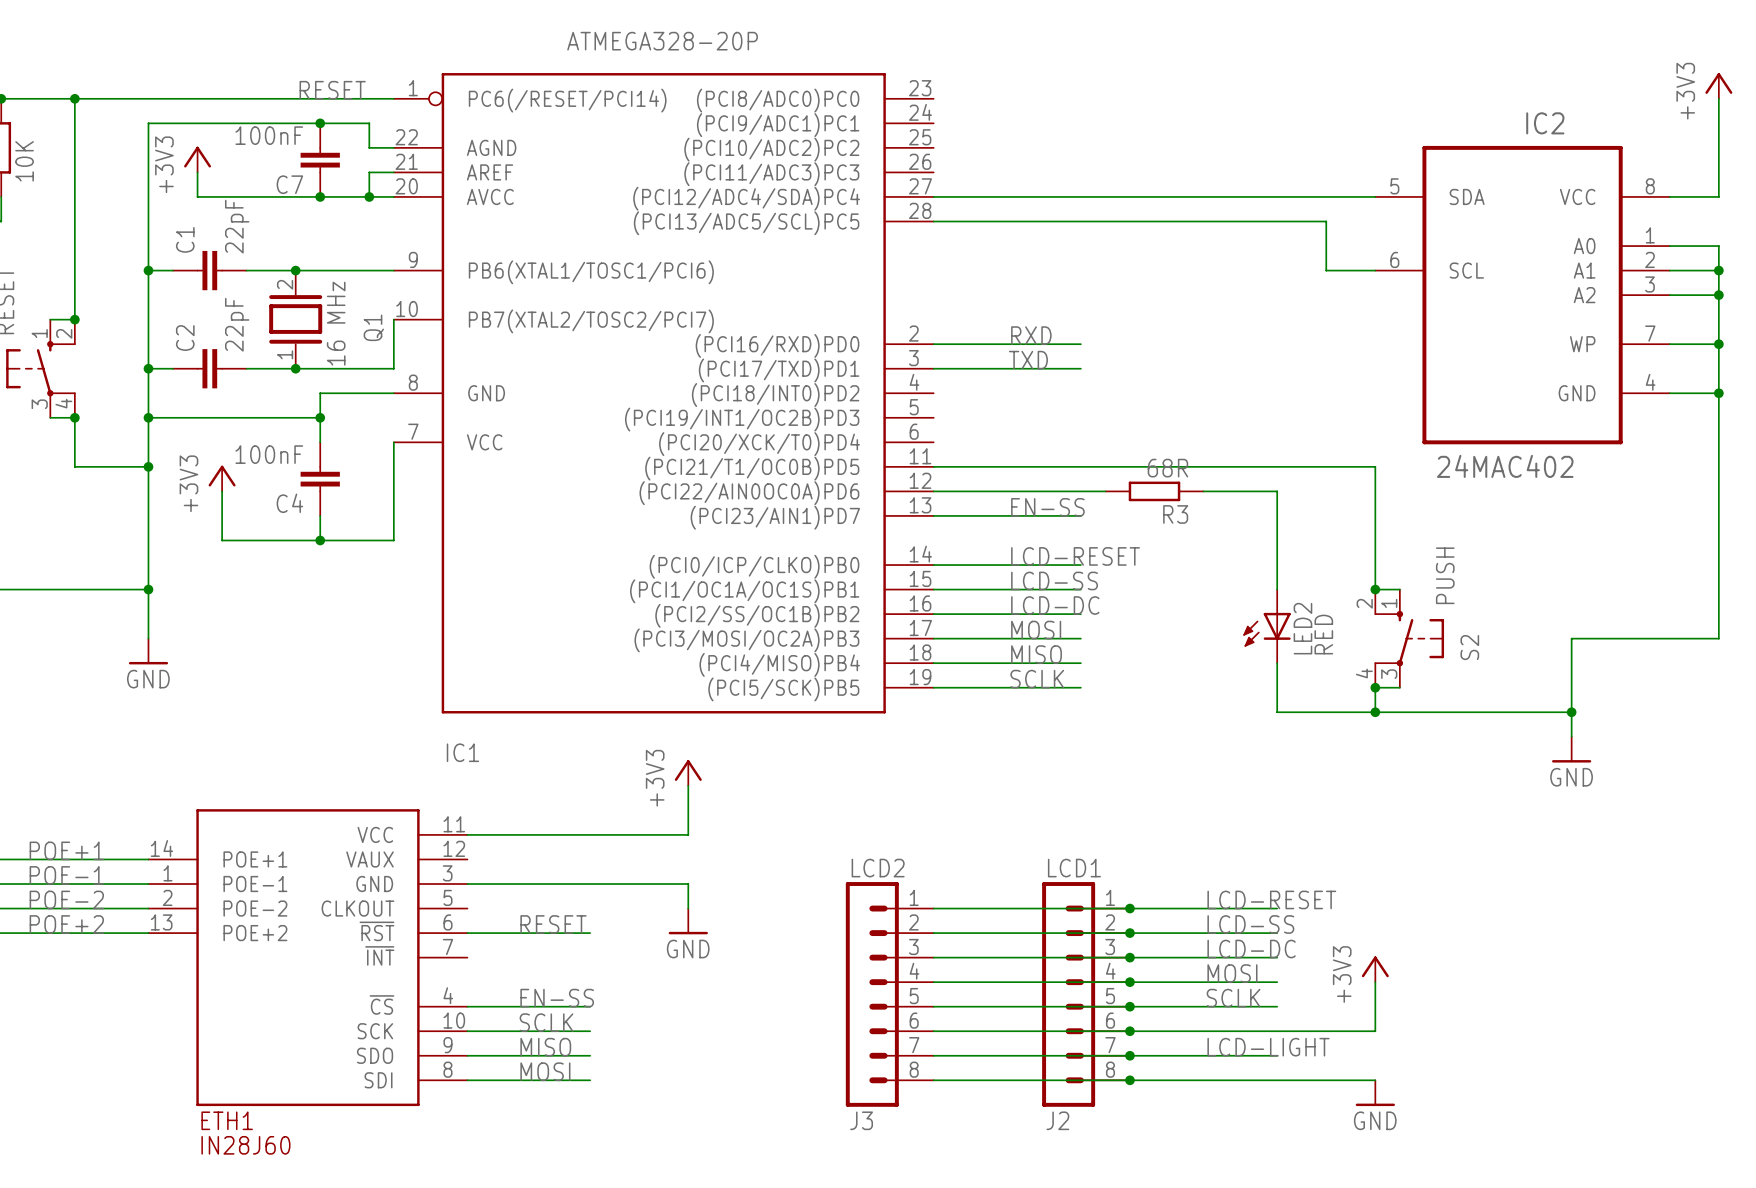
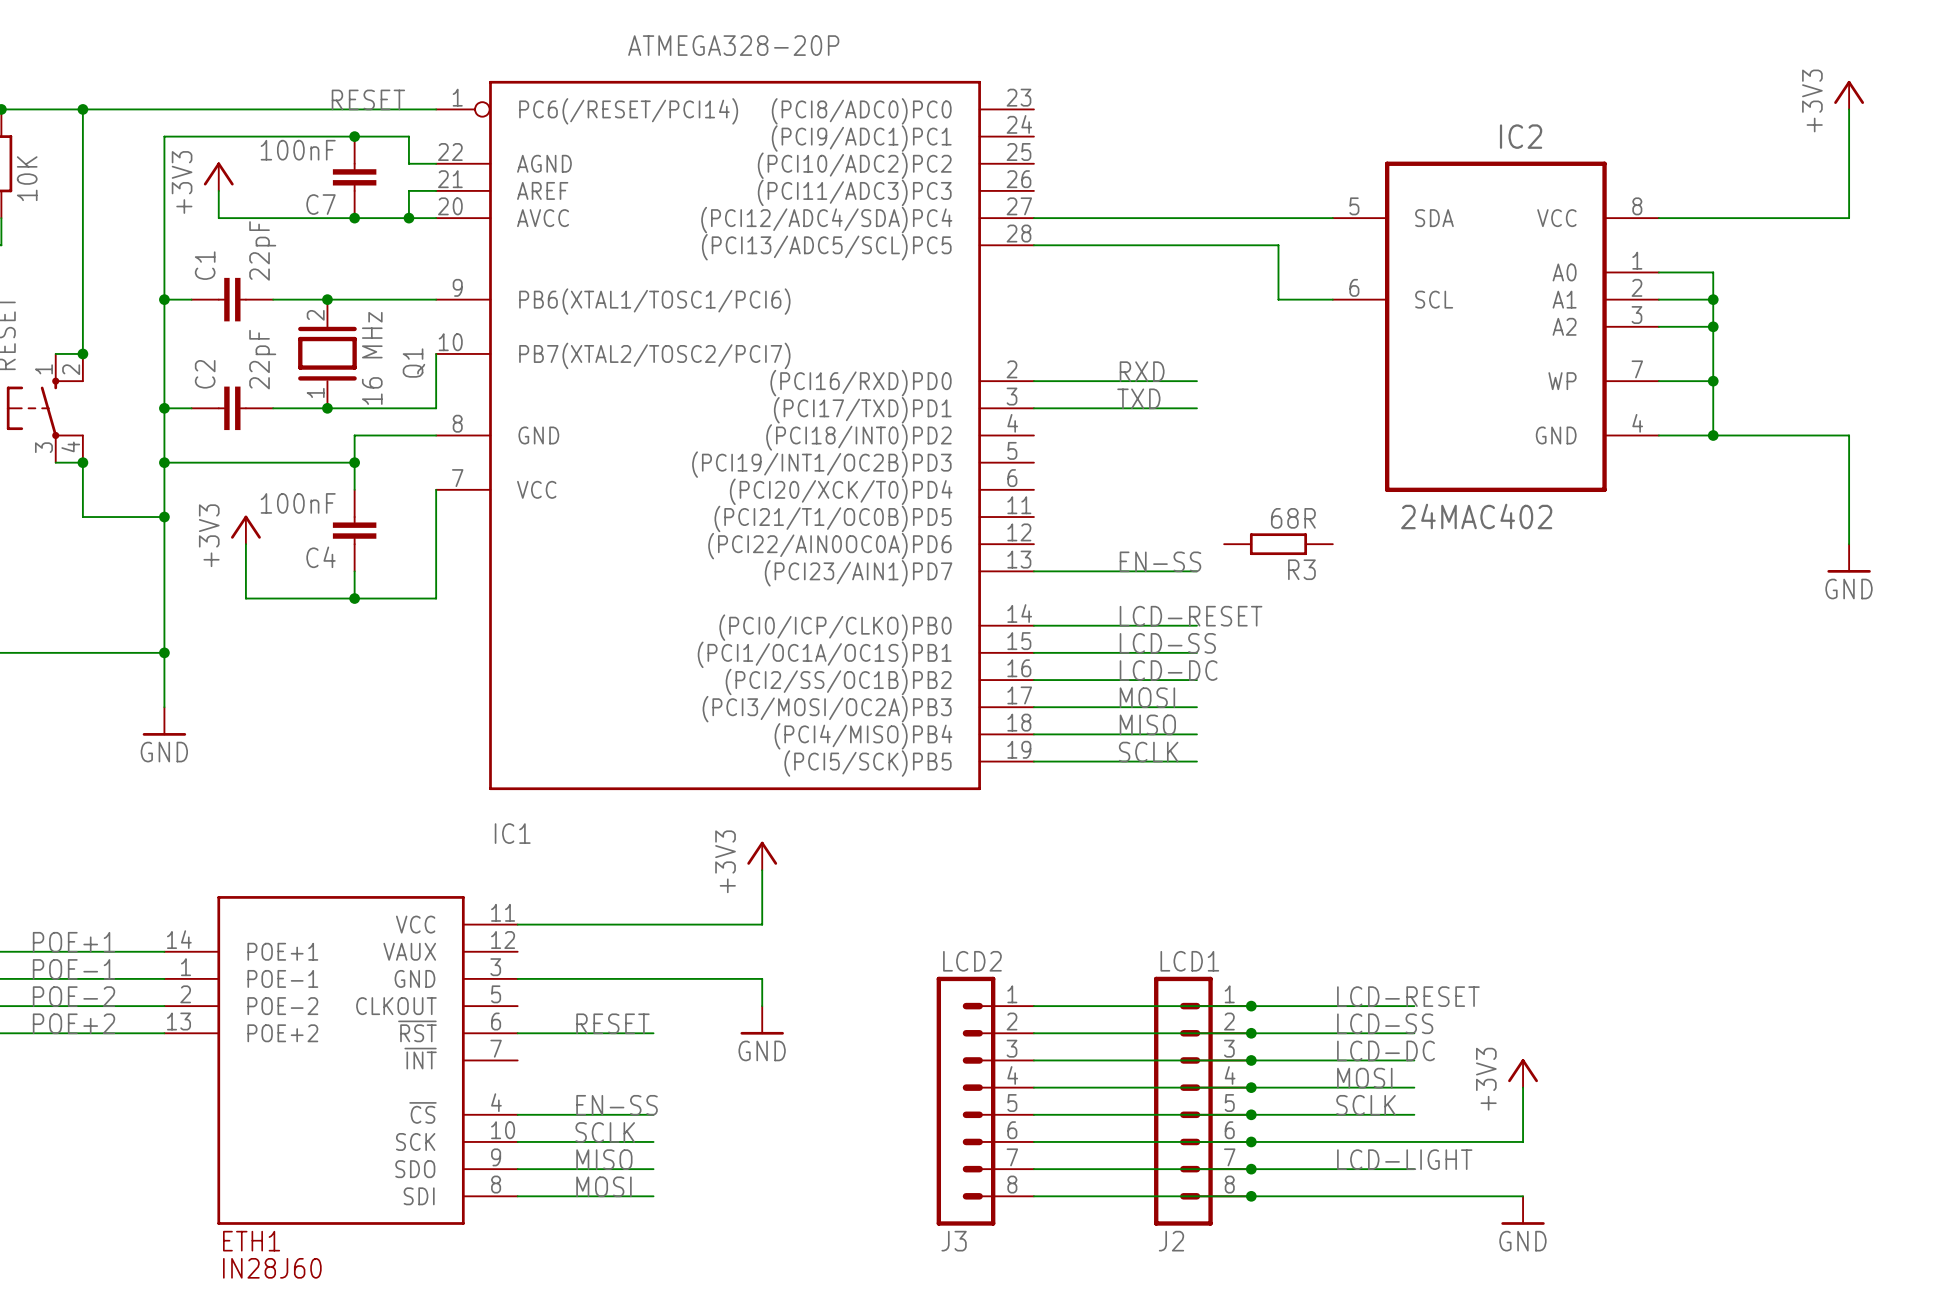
power symbol position: +3V3 (1718, 85) -> +3V3 (1849, 95)
wire: none -> (1849, 109) (1849, 218) (1658, 218)
wire: (1718, 98) (1718, 196) (1669, 196) -> none
wire: (1203, 196) (1375, 196) -> none
wire: (1154, 221) (1326, 221) (1326, 270) (1375, 270) -> (1278, 245) (1278, 299) (1332, 299)
wire: none -> (1658, 272) (1713, 272) (1713, 435)
wire: (1669, 246) (1718, 246) (1718, 638) (1571, 638) (1571, 736) -> none
junction: none -> (1713, 299)
wire: (1669, 270) (1718, 270) -> (1658, 299) (1713, 299)
junction: (1718, 270) -> none
IC2 position: (1522, 295) -> (1495, 326)
junction: none -> (1713, 326)
wire: (1669, 295) (1718, 295) -> (1658, 326) (1713, 326)
junction: (1718, 295) -> none
junction: none -> (1713, 381)
wire: (1669, 344) (1718, 344) -> (1658, 381) (1713, 381)
junction: (1718, 344) -> none
wire: none -> (1658, 435) (1849, 435) (1849, 544)
junction: none -> (1713, 435)
wire: (1669, 393) (1718, 393) -> none
junction: (1718, 393) -> none
wire: (933, 466) (1375, 466) (1375, 589) (1399, 589) -> none
wire: (933, 491) (1105, 491) -> none
wire: (1203, 491) (1277, 491) (1277, 589) -> none
power symbol: none -> GND (1849, 558)
junction: (1375, 589) -> none
LED2: RED (1267, 626) -> none
S2: PUSH (1409, 638) -> none
wire: (1277, 663) (1277, 712) (1571, 712) -> none
junction: (1375, 687) -> none
wire: (1399, 687) (1375, 687) (1375, 712) -> none
junction: (1375, 712) -> none
junction: (1571, 712) -> none
power symbol: GND (1571, 749) -> none

